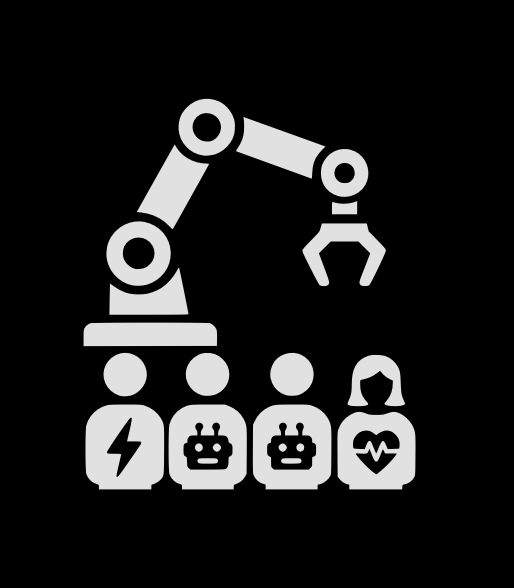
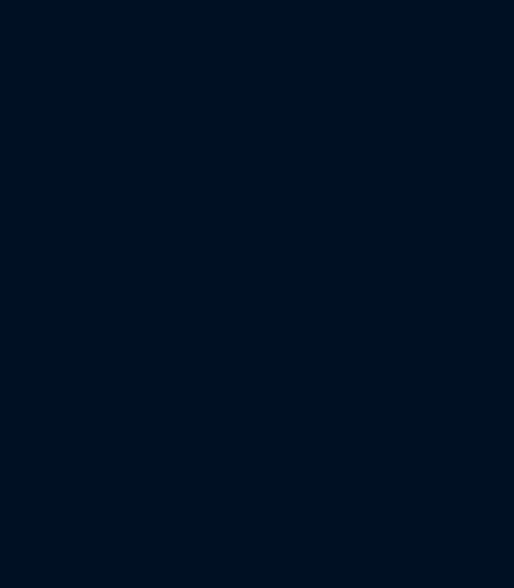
drawing: [83, 98, 416, 490] -> none

